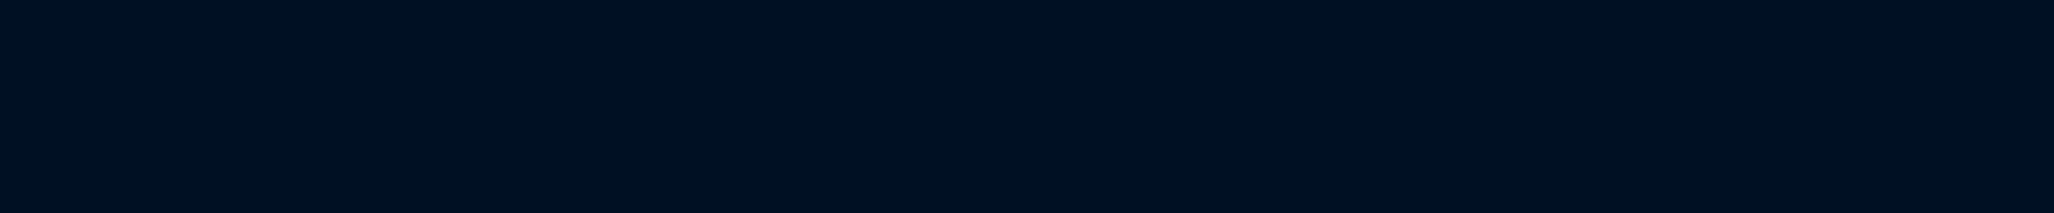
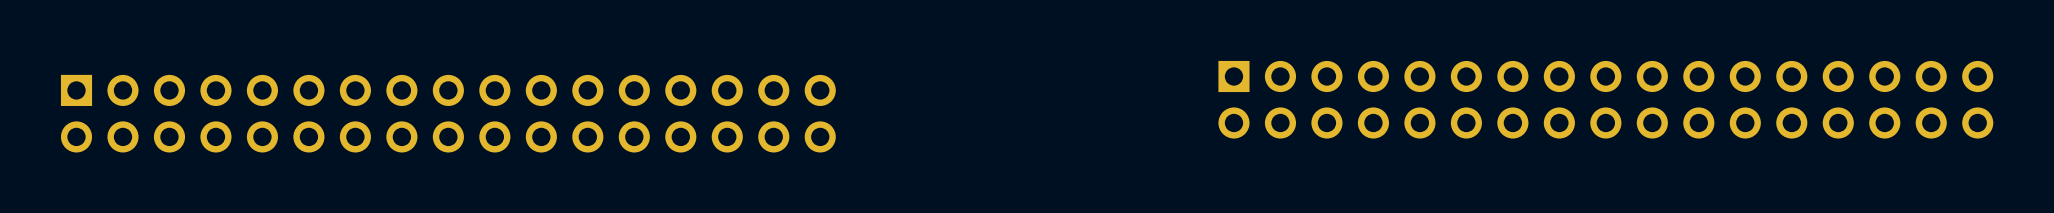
part: none -> (1605, 99)
part: none -> (448, 113)

